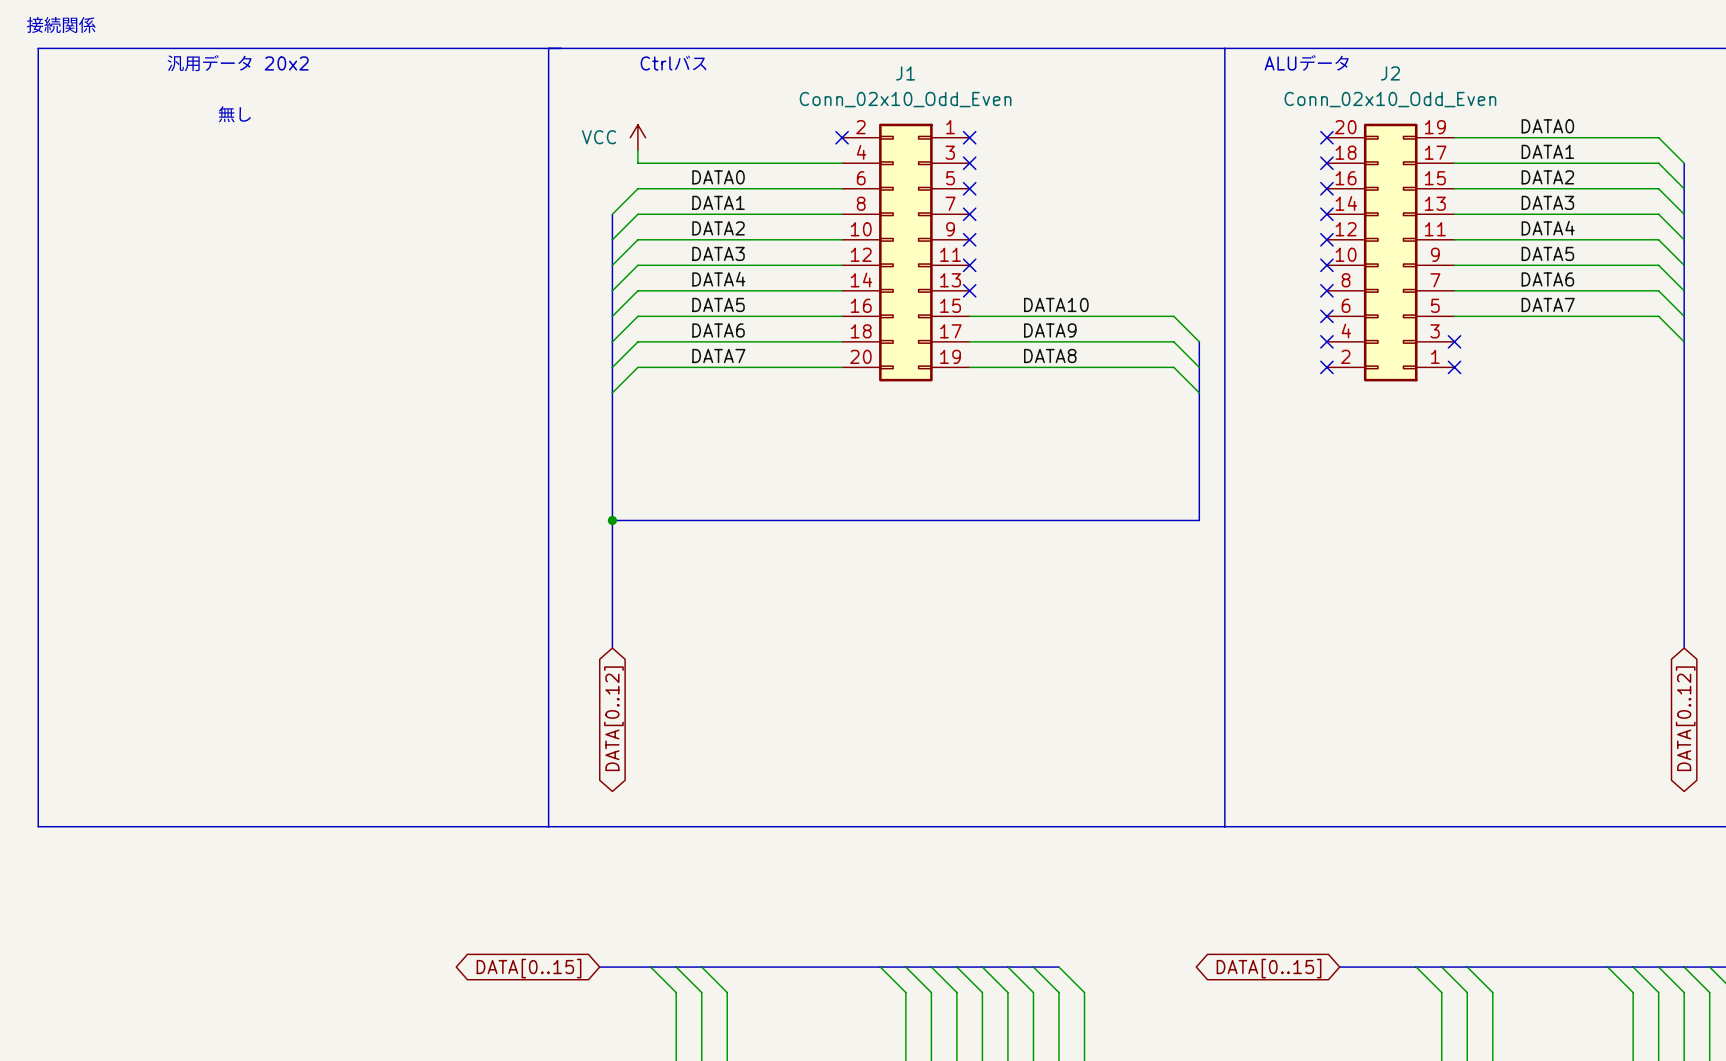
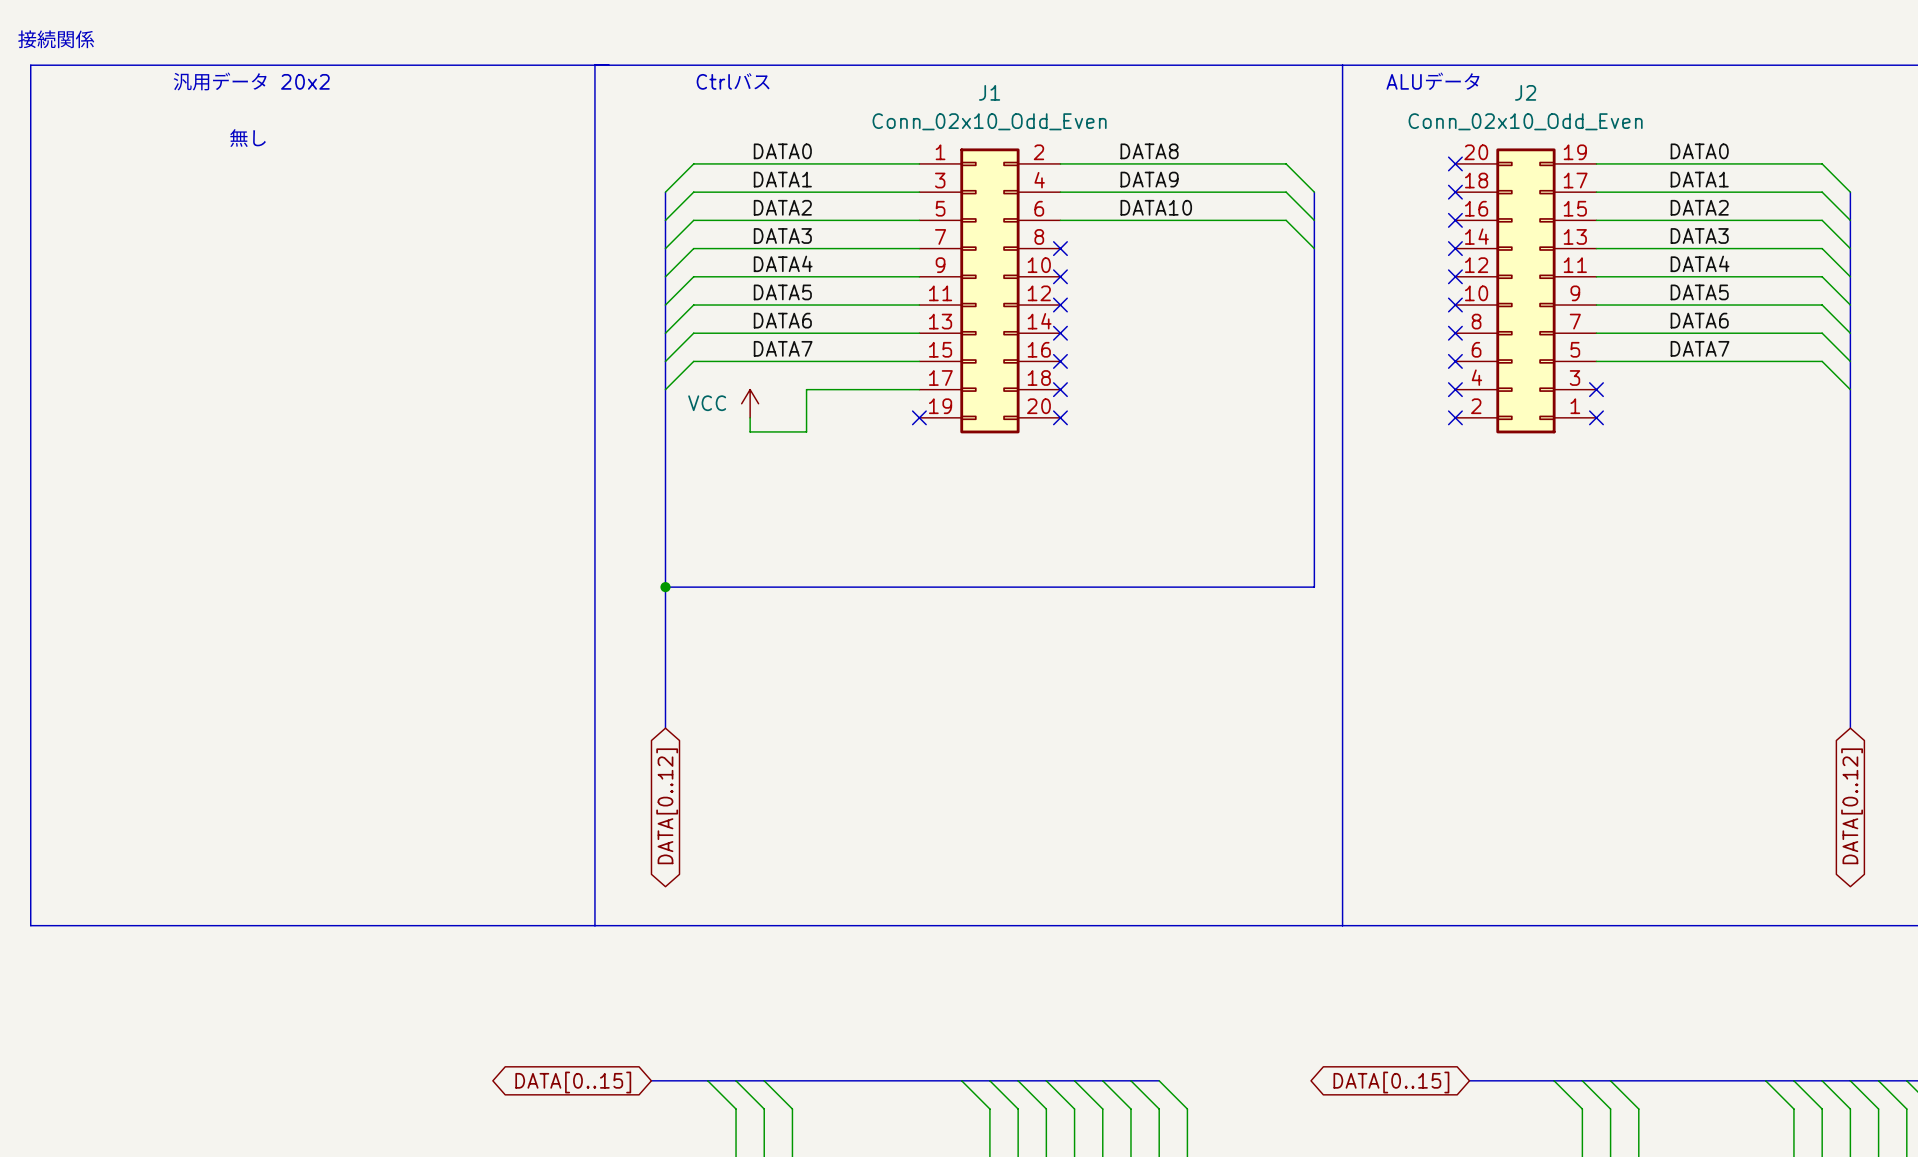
label: none -> DATA0 (782, 151)
power symbol position: VCC (637, 137) -> VCC (750, 403)
no-connect mark: (842, 137) -> none
no-connect mark: (969, 137) -> none
wire: (637, 150) (637, 163) -> (665, 220) (693, 192)
label: none -> DATA1 (782, 179)
bus: none -> (665, 192) (665, 248)
no-connect mark: (969, 163) -> none
bus: none -> (1314, 192) (1314, 389)
label: DATA0 (718, 177) -> DATA2 (782, 207)
no-connect mark: (969, 188) -> none
label: DATA1 (718, 202) -> DATA3 (782, 235)
label: DATA2 (718, 228) -> DATA4 (783, 263)
J1 flip: as is (905, 252) -> left-right (989, 290)
label: DATA3 (718, 253) -> DATA5 (782, 292)
label: DATA4 (718, 279) -> DATA6 (782, 320)
label: DATA5 (718, 304) -> DATA7 (783, 348)
label position: DATA10 (1056, 304) -> DATA10 (1156, 207)
wire: (969, 316) (1173, 316) (1199, 341) -> (1060, 163) (1286, 163) (1314, 192)
no-connect mark: none -> (1060, 361)
label: DATA6 (718, 330) -> none
label position: DATA9 (1050, 330) -> DATA9 (1149, 179)
wire: (740, 341) (637, 341) (612, 367) -> (806, 389) (806, 431) (750, 431) (750, 417)
wire: (969, 341) (1173, 341) (1199, 367) -> (1060, 192) (1286, 192) (1314, 220)
no-connect mark: none -> (1060, 389)
label: DATA7 (718, 355) -> none
label position: DATA8 (1050, 355) -> DATA8 (1149, 151)
wire: (842, 367) (637, 367) (612, 392) -> (919, 163) (693, 163) (665, 192)
no-connect mark: none -> (919, 417)
wire: (969, 367) (1173, 367) (1199, 392) -> (1060, 220) (1286, 220) (1314, 248)
no-connect mark: none -> (1060, 417)

